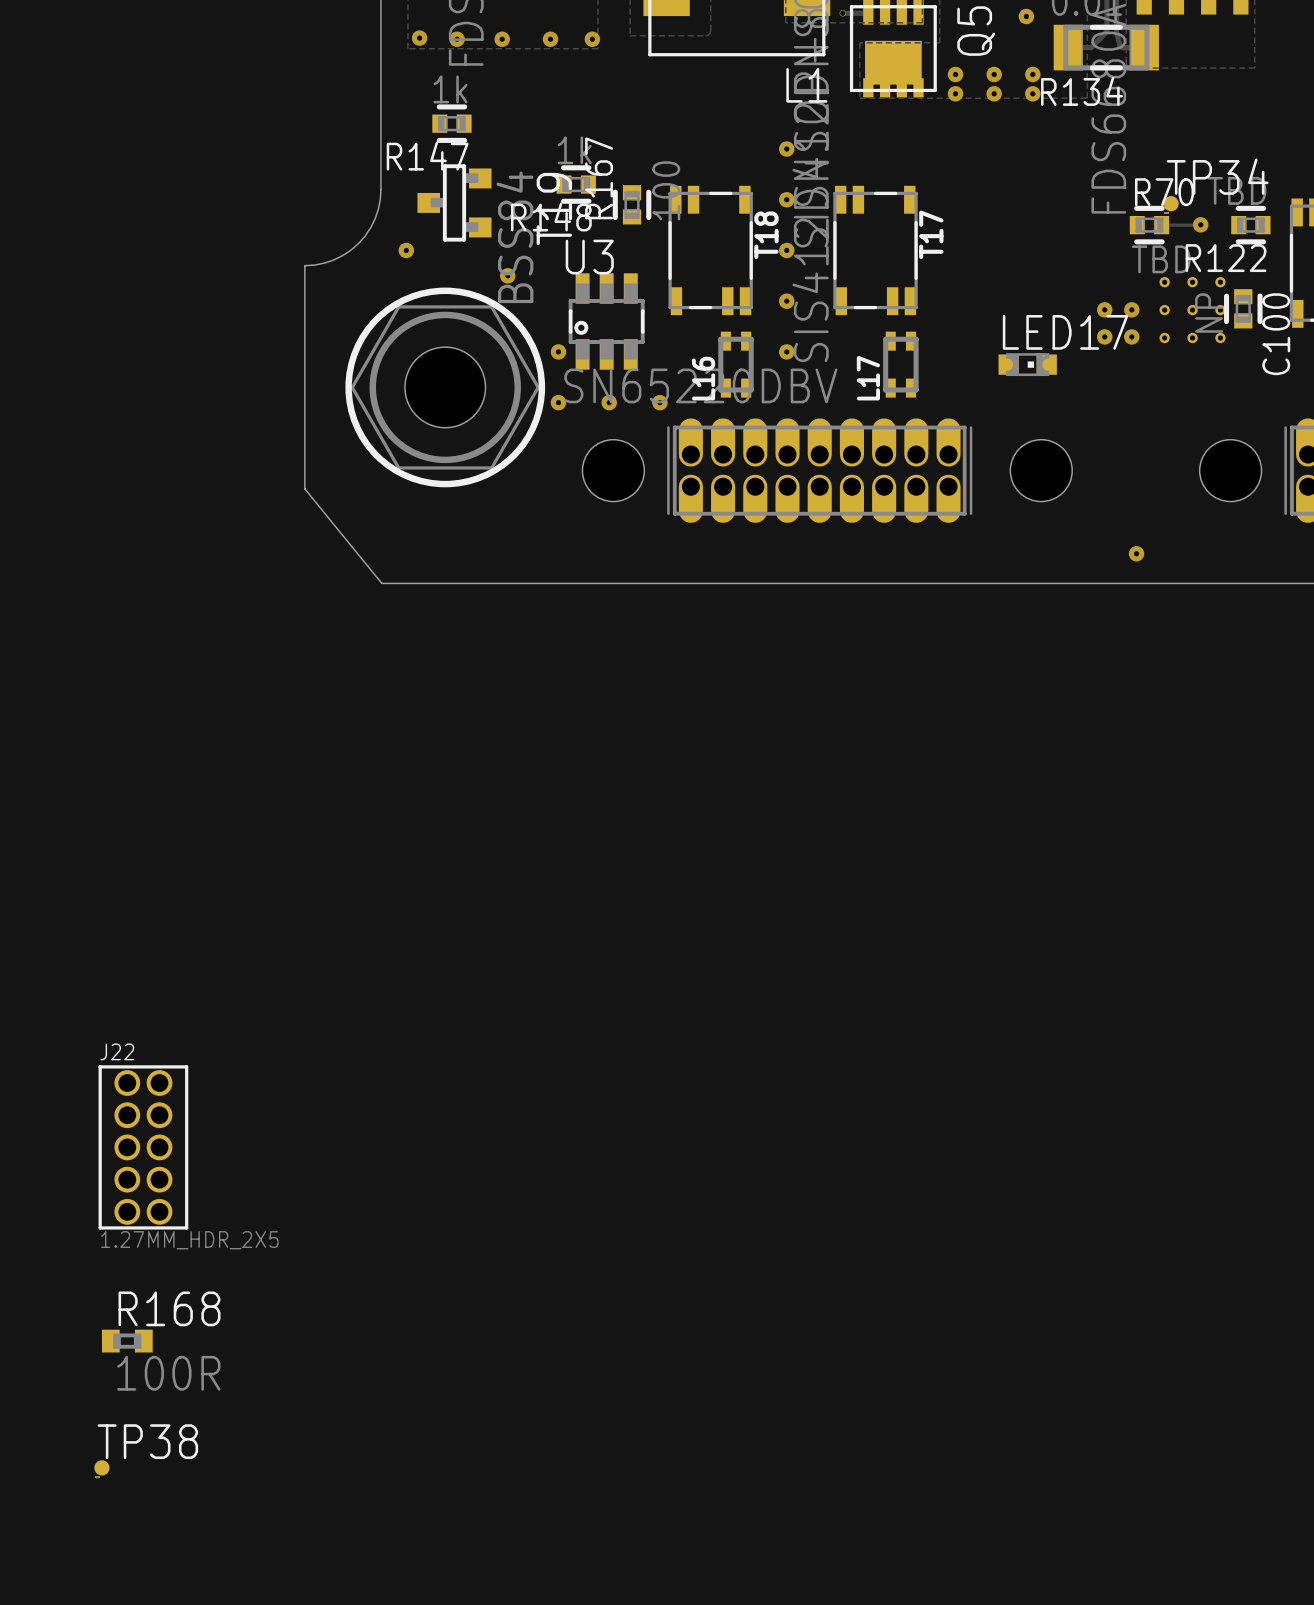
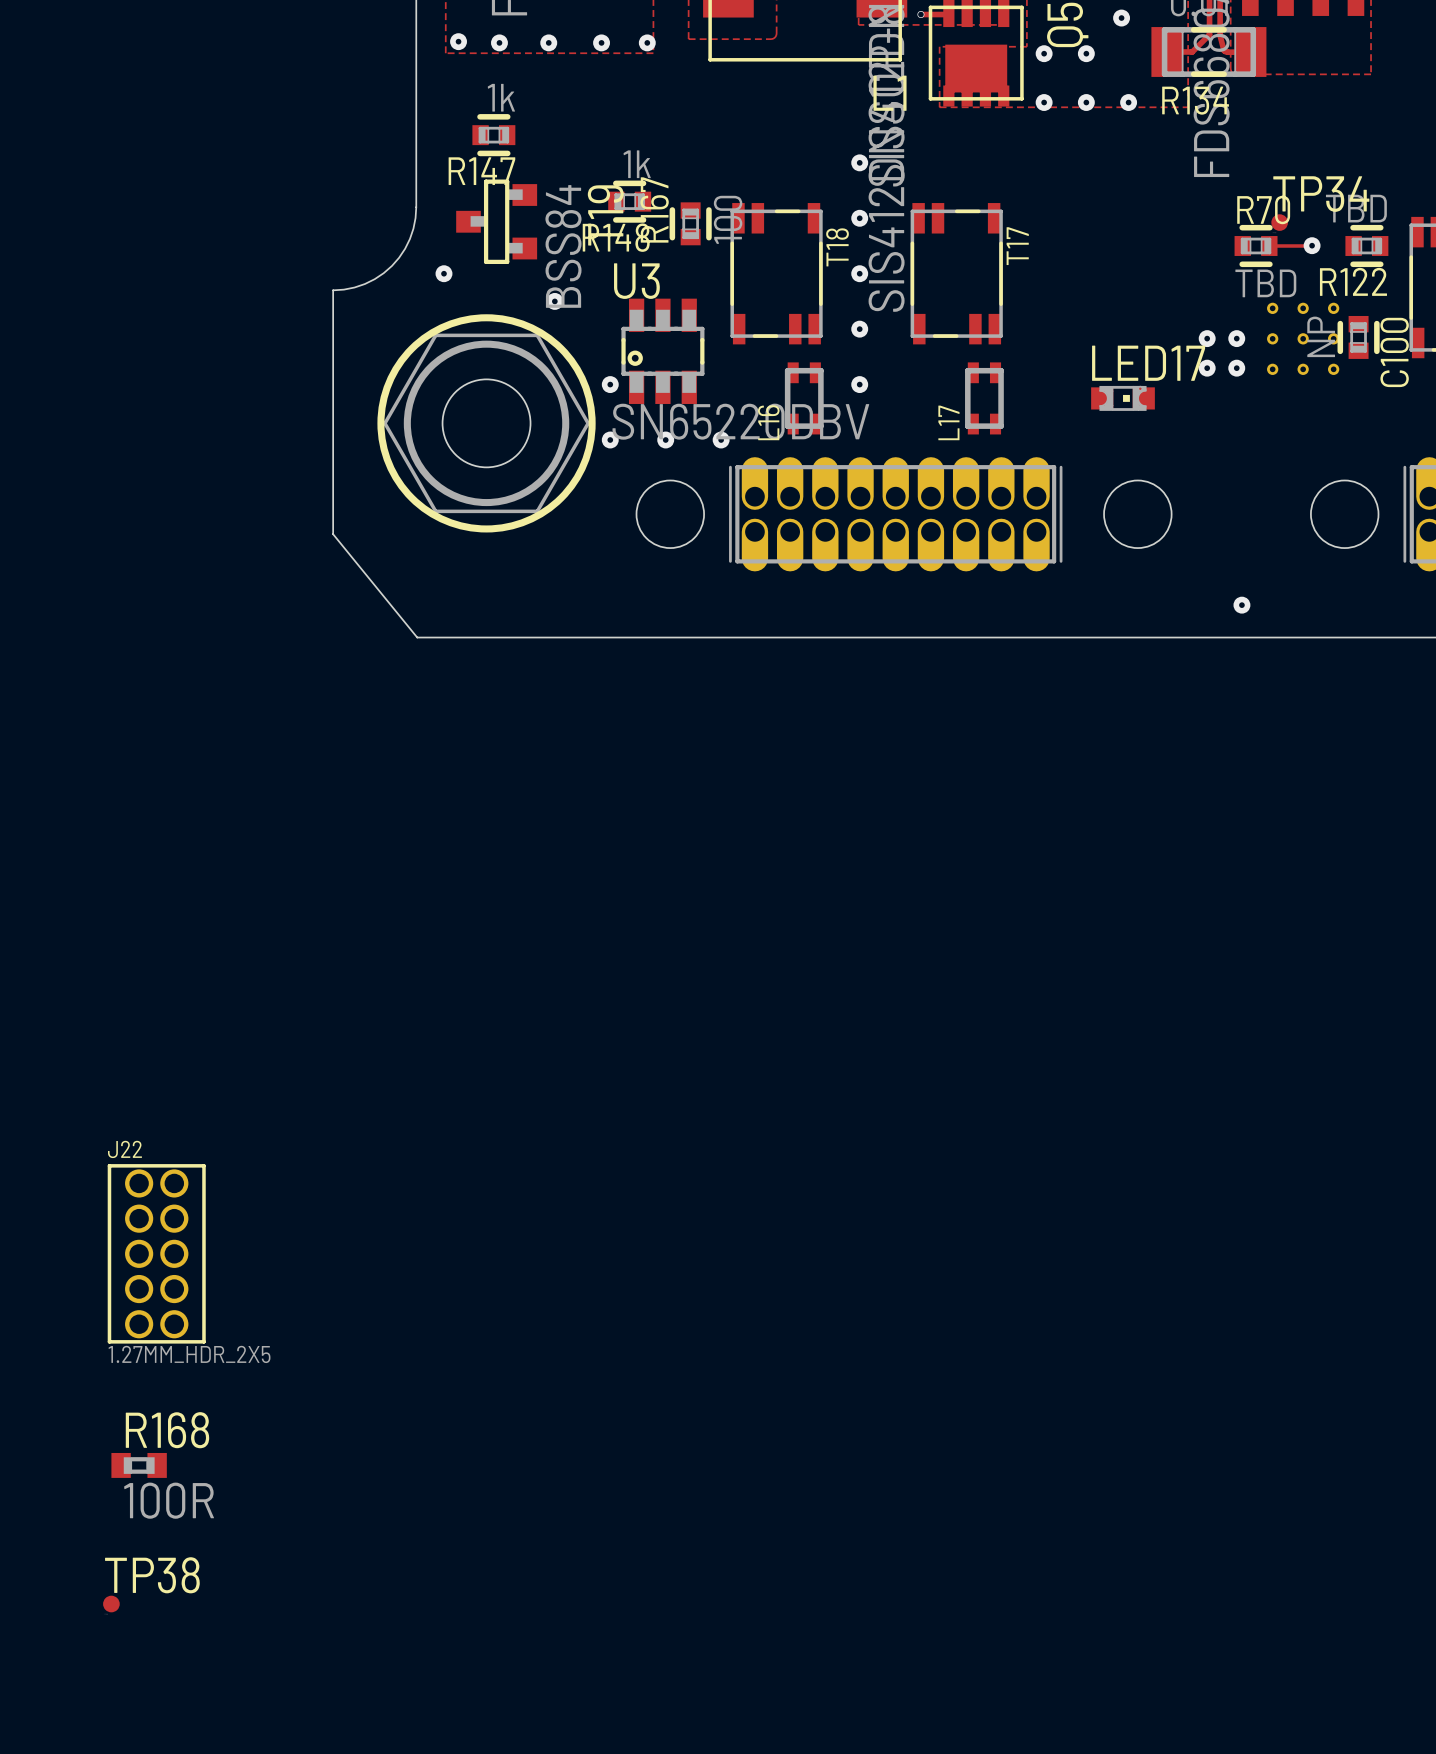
via: none -> (1044, 53)
via: none -> (1086, 53)
via: (955, 74) -> none
via: (994, 74) -> none
via: (1032, 74) -> none

